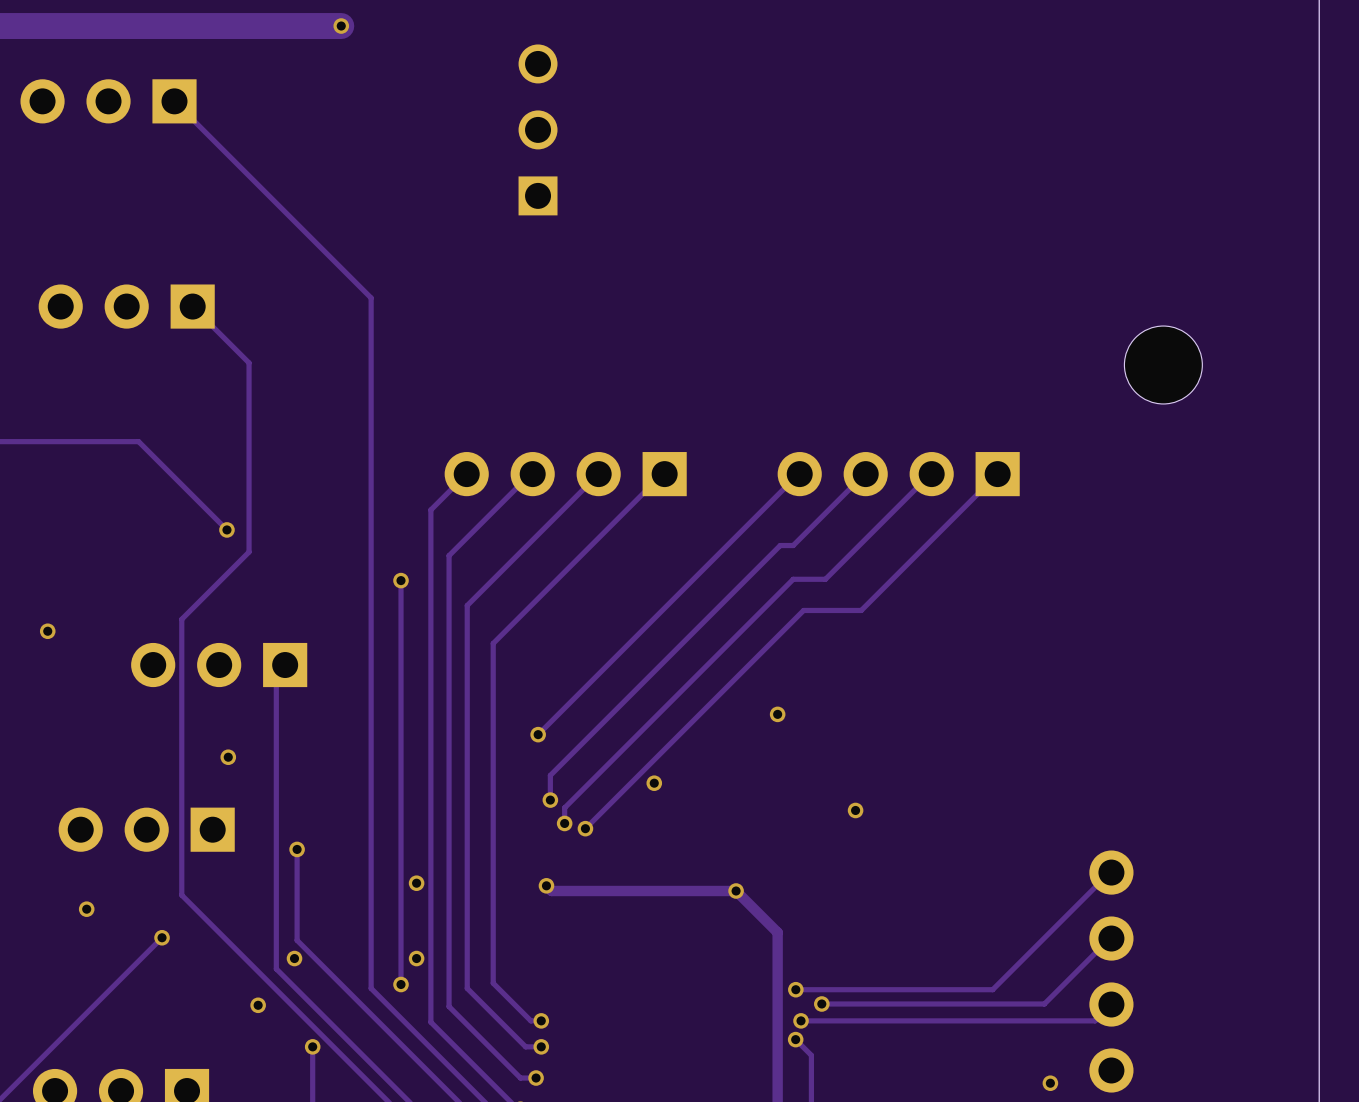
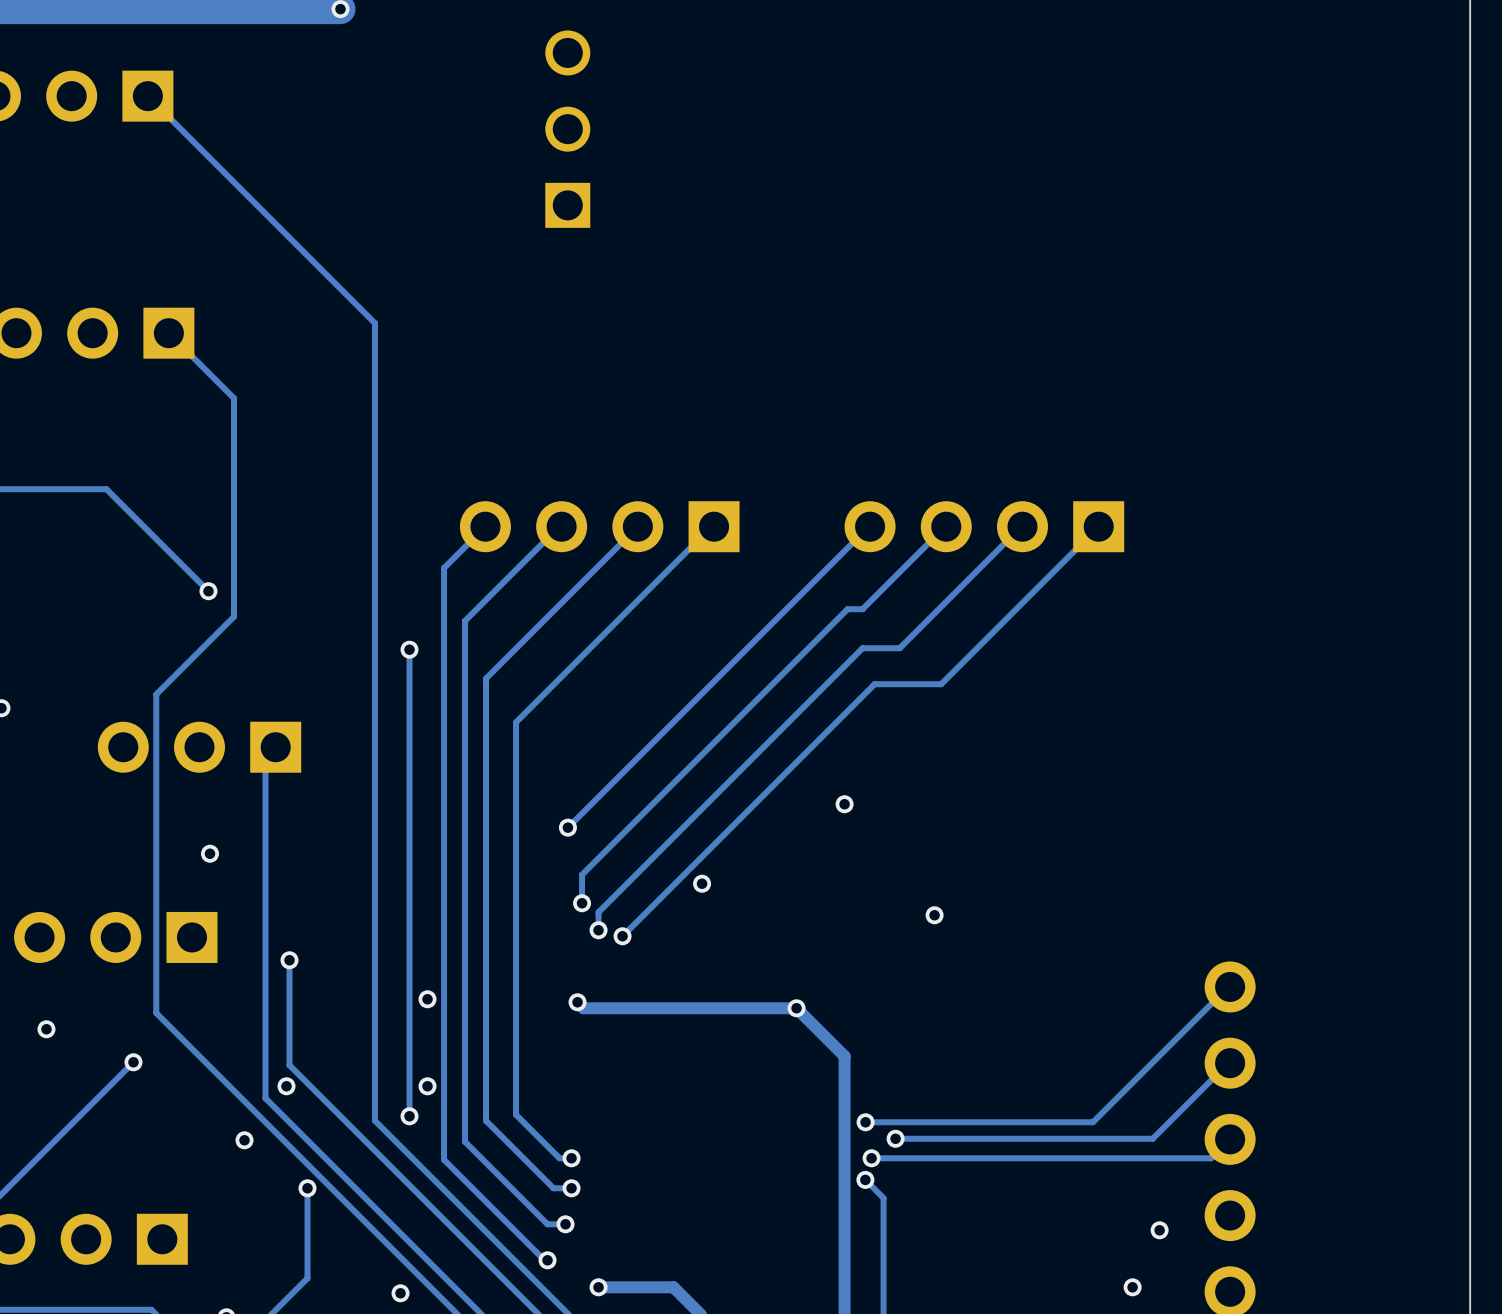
part: (1163, 365) -> none

